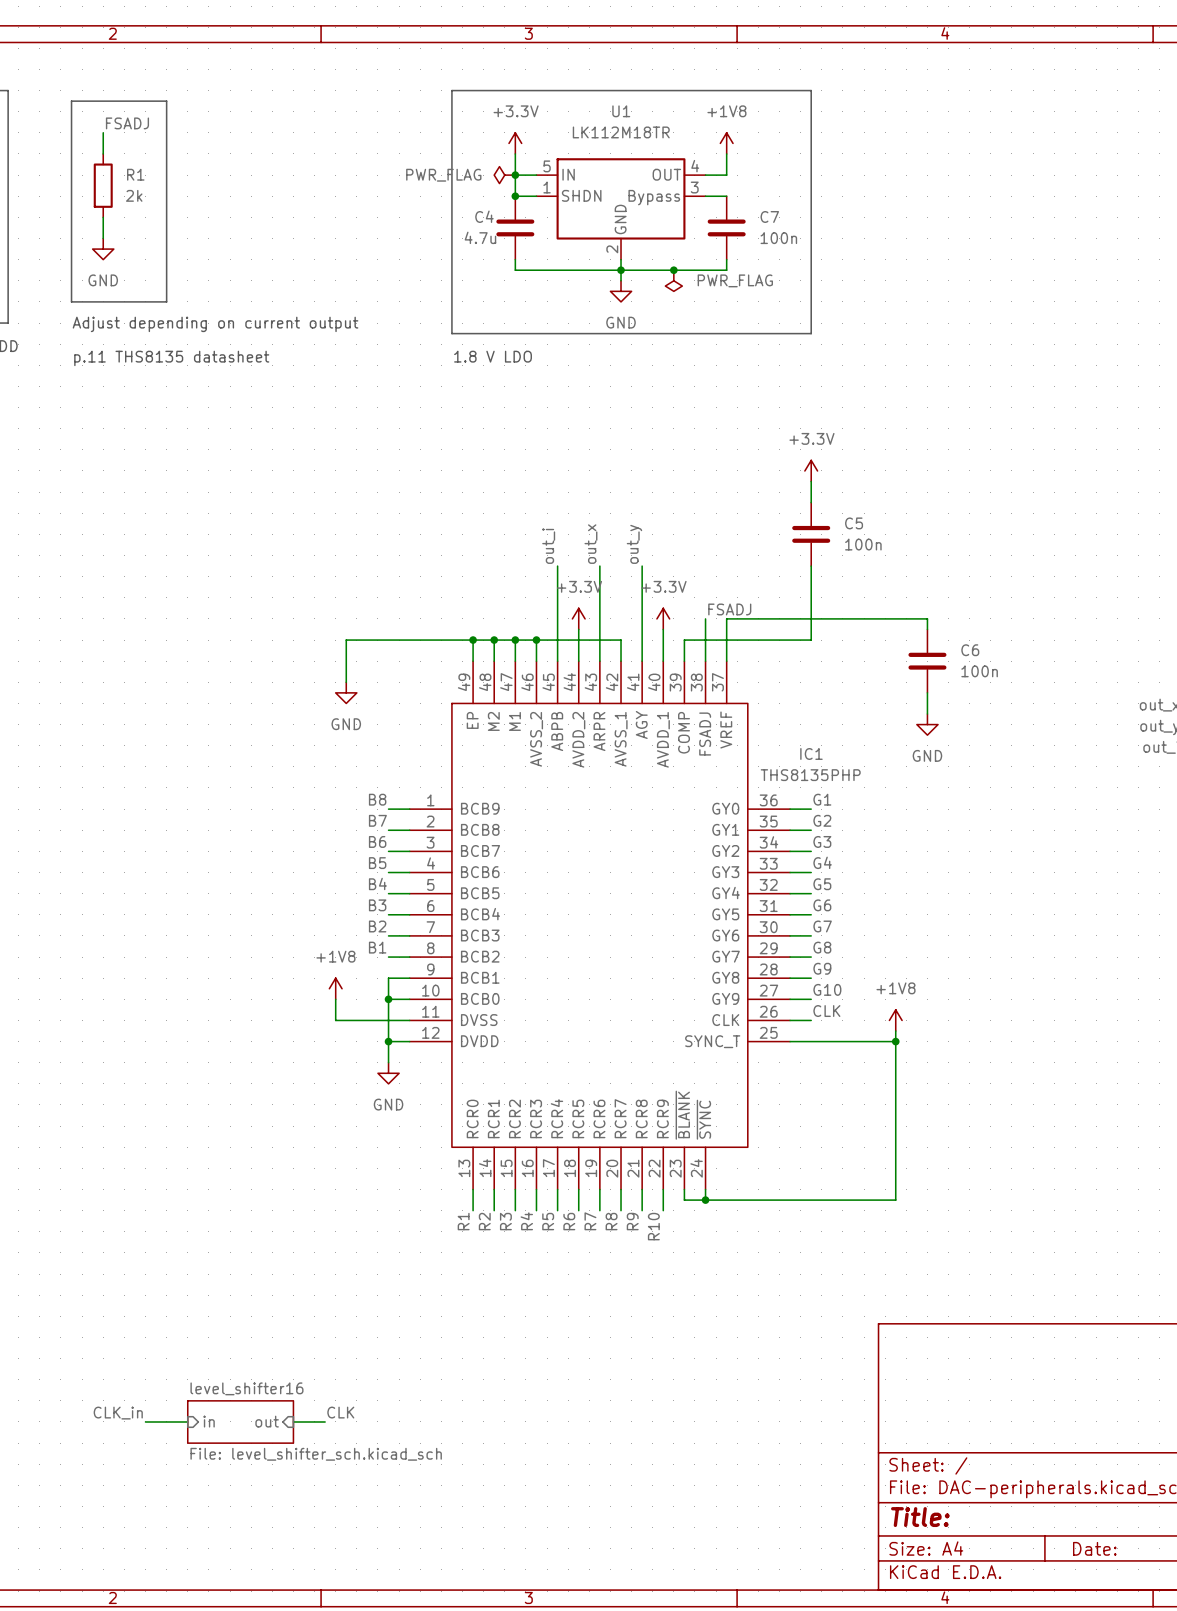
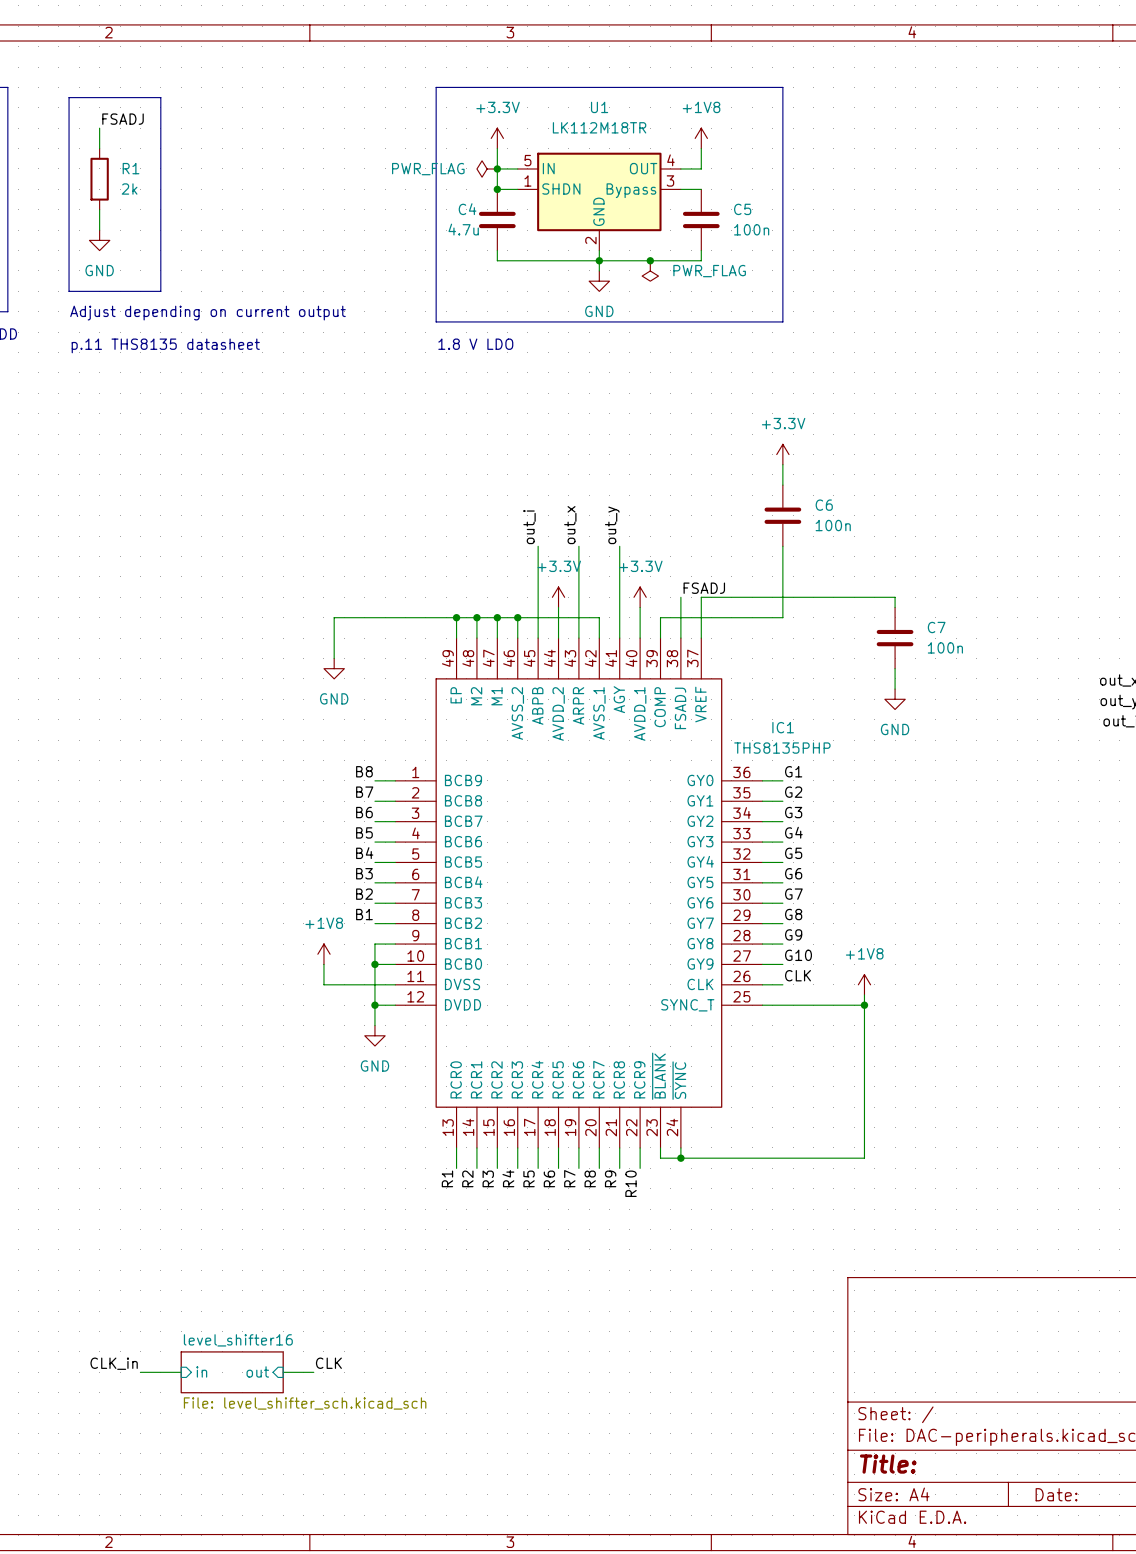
C7 name: C7 (769, 216) -> C5 (742, 209)
C5 name: C5 (854, 523) -> C6 (824, 505)
C6 name: C6 (970, 650) -> C7 (936, 627)

